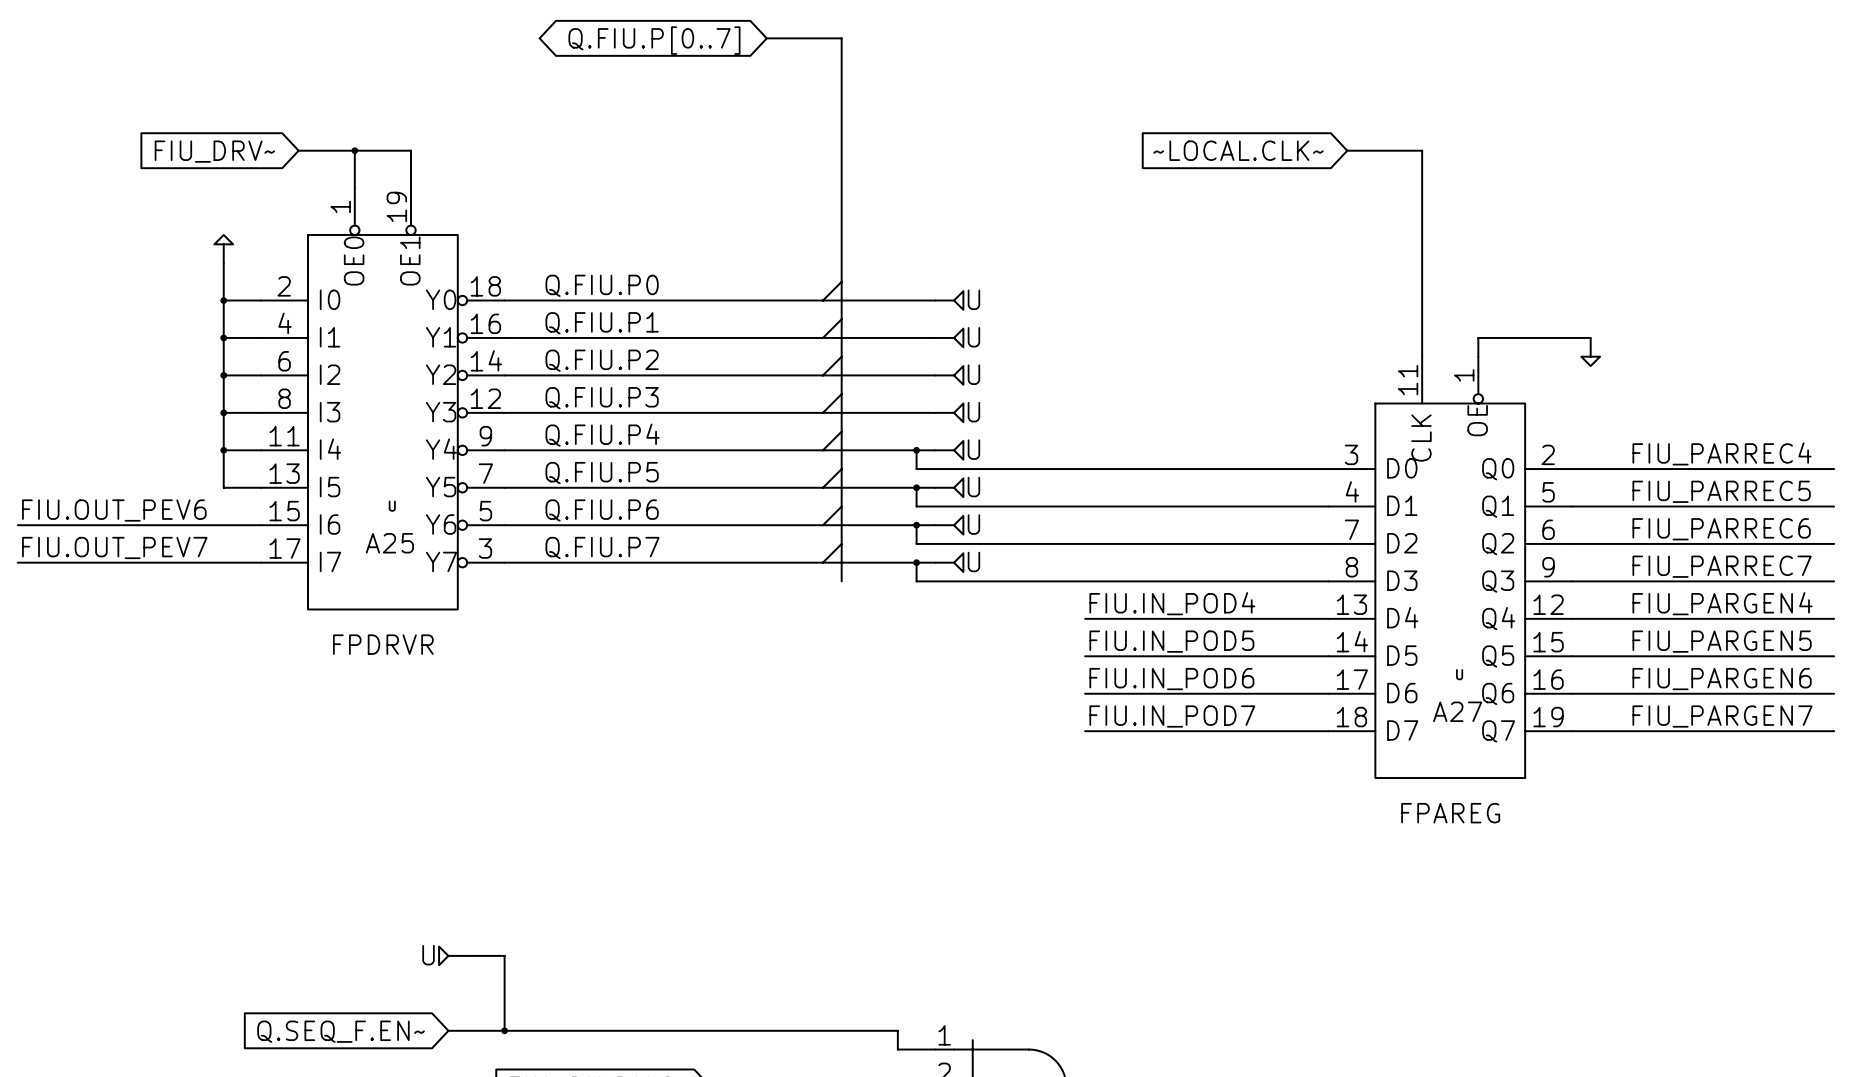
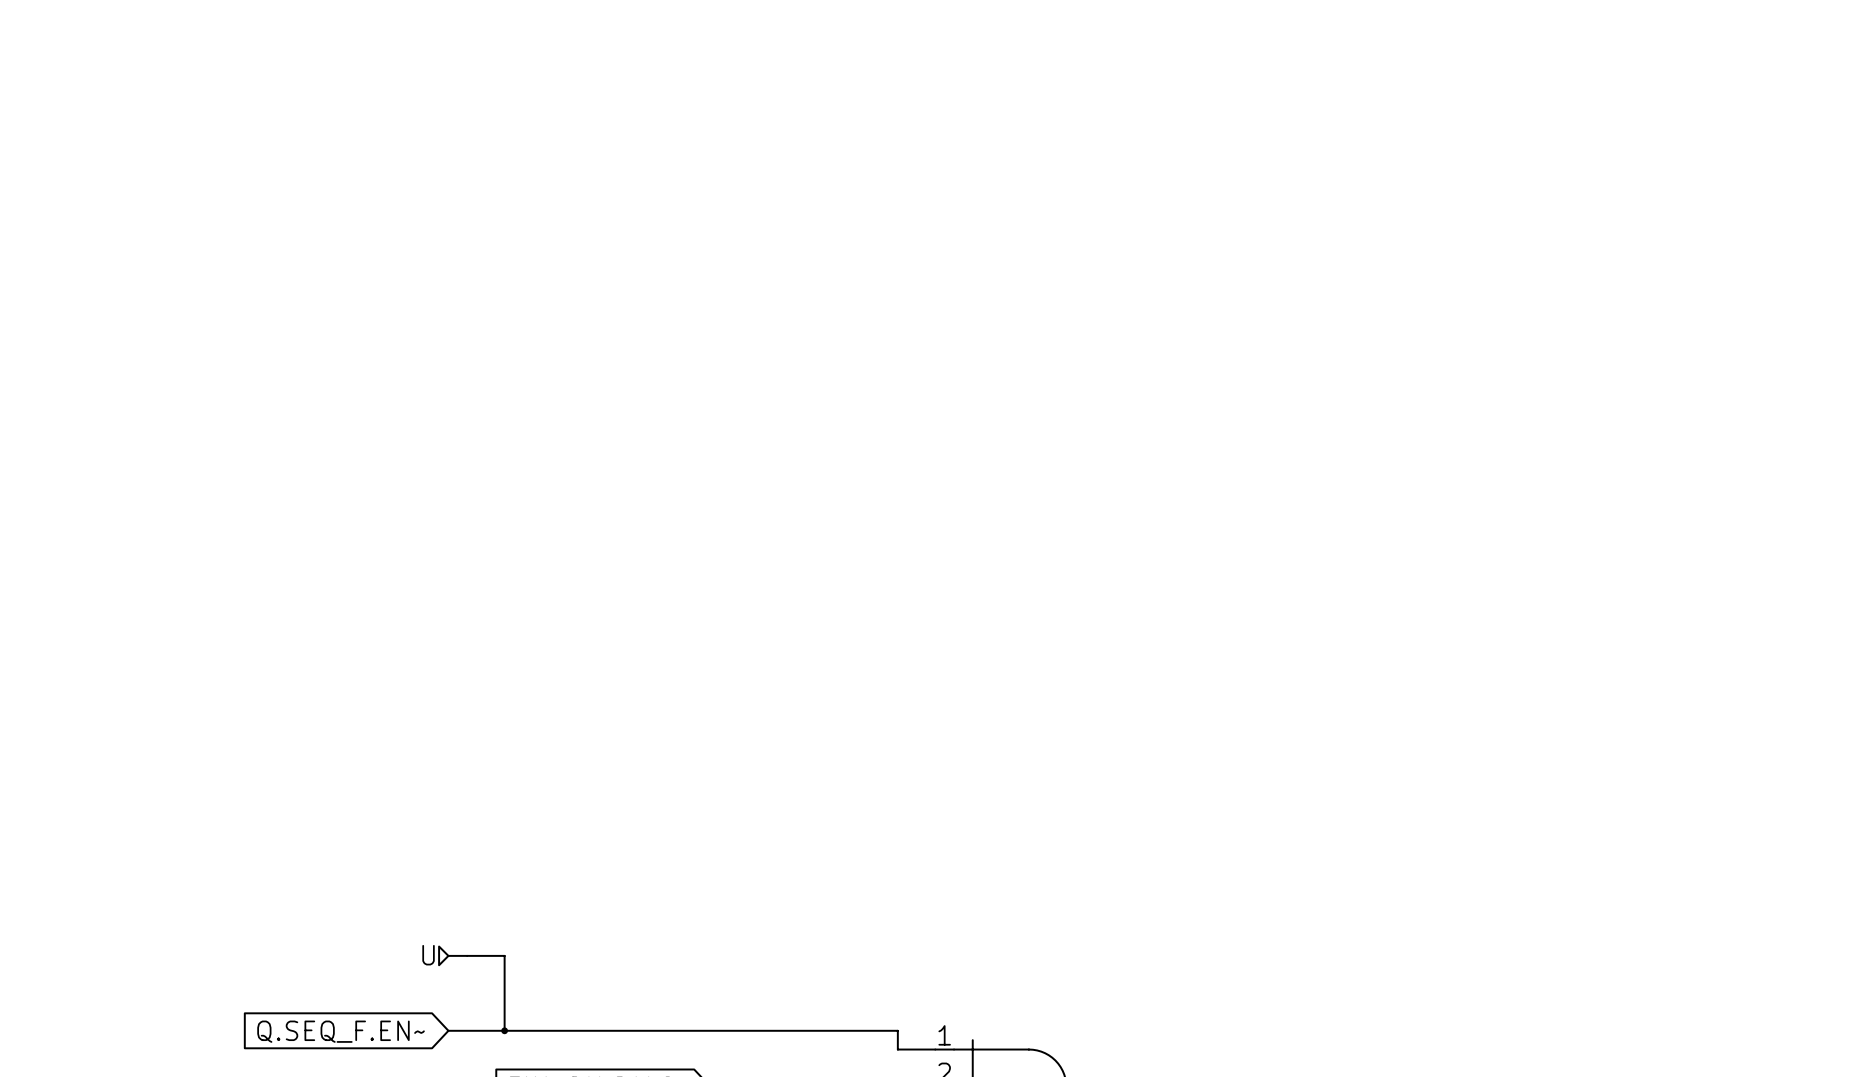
bus: (766, 38) (841, 38) (841, 581) -> none
global label: Q.FIU.P[0..7] (654, 40) -> none
wire: (298, 150) (410, 150) (410, 188) -> none
wire: (354, 150) (354, 188) -> none
junction: (354, 150) -> none
global label: ~LOCAL.CLK~ (1238, 150) -> none
wire: (1347, 150) (1422, 150) (1422, 356) -> none
global label: FIU_DRV~ (214, 151) -> none
power symbol: (223, 248) -> none
wire: (223, 263) (223, 487) (261, 487) -> none
wire: (841, 281) (822, 300) -> none
label: Q.FIU.P0 (602, 285) -> none
wire: (223, 300) (261, 300) -> none
junction: (223, 300) -> none
wire: (504, 300) (935, 300) -> none
U: (949, 300) -> none
wire: (841, 319) (822, 337) -> none
label: Q.FIU.P1 (602, 323) -> none
wire: (223, 337) (261, 337) -> none
junction: (223, 337) -> none
wire: (504, 337) (935, 337) -> none
U: (949, 337) -> none
wire: (1590, 337) (1478, 337) (1478, 356) -> none
power symbol: (1590, 352) -> none
wire: (841, 356) (822, 375) -> none
label: Q.FIU.P2 (602, 360) -> none
wire: (223, 375) (261, 375) -> none
junction: (223, 375) -> none
wire: (504, 375) (935, 375) -> none
U: (949, 375) -> none
wire: (841, 394) (822, 412) -> none
U: (382, 398) -> none
label: Q.FIU.P3 (602, 398) -> none
wire: (223, 412) (261, 412) -> none
junction: (223, 412) -> none
wire: (504, 412) (935, 412) -> none
U: (949, 412) -> none
wire: (841, 431) (822, 450) -> none
label: Q.FIU.P4 (602, 435) -> none
wire: (223, 450) (261, 450) -> none
junction: (223, 450) -> none
wire: (504, 450) (935, 450) -> none
wire: (916, 450) (916, 469) (1328, 469) -> none
junction: (916, 450) -> none
U: (949, 450) -> none
label: FIU_PARREC4 (1722, 453) -> none
wire: (841, 469) (822, 487) -> none
wire: (1571, 469) (1834, 469) -> none
label: Q.FIU.P5 (602, 473) -> none
wire: (504, 487) (935, 487) -> none
wire: (916, 487) (916, 506) (1328, 506) -> none
junction: (916, 487) -> none
U: (949, 487) -> none
label: FIU_PARREC5 (1721, 491) -> none
wire: (841, 506) (822, 525) -> none
wire: (1571, 506) (1834, 506) -> none
label: FIU.OUT_PEV6 (114, 510) -> none
label: Q.FIU.P6 (602, 510) -> none
wire: (17, 525) (261, 525) -> none
wire: (504, 525) (935, 525) -> none
wire: (916, 525) (916, 543) (1328, 543) -> none
junction: (916, 525) -> none
U: (949, 525) -> none
label: FIU_PARREC6 (1721, 529) -> none
wire: (841, 543) (822, 562) -> none
wire: (1571, 543) (1834, 543) -> none
label: FIU.OUT_PEV7 (114, 547) -> none
label: Q.FIU.P7 (602, 547) -> none
wire: (17, 562) (261, 562) -> none
wire: (504, 562) (935, 562) -> none
wire: (916, 562) (916, 581) (1328, 581) -> none
junction: (916, 562) -> none
U: (949, 562) -> none
label: FIU_PARREC7 (1722, 566) -> none
U: (1450, 567) -> none
wire: (1571, 581) (1834, 581) -> none
label: FIU.IN_POD4 (1172, 603) -> none
label: FIU_PARGEN4 (1722, 603) -> none
wire: (1085, 618) (1328, 618) -> none
wire: (1571, 618) (1834, 618) -> none
label: FIU.IN_POD5 (1171, 641) -> none
label: FIU_PARGEN5 (1722, 641) -> none
wire: (1085, 656) (1328, 656) -> none
wire: (1571, 656) (1834, 656) -> none
label: FIU.IN_POD6 (1171, 679) -> none
label: FIU_PARGEN6 (1722, 679) -> none
wire: (1085, 693) (1328, 693) -> none
wire: (1571, 693) (1834, 693) -> none
label: FIU.IN_POD7 (1172, 716) -> none
label: FIU_PARGEN7 (1722, 716) -> none
wire: (1085, 731) (1328, 731) -> none
wire: (1571, 731) (1834, 731) -> none

